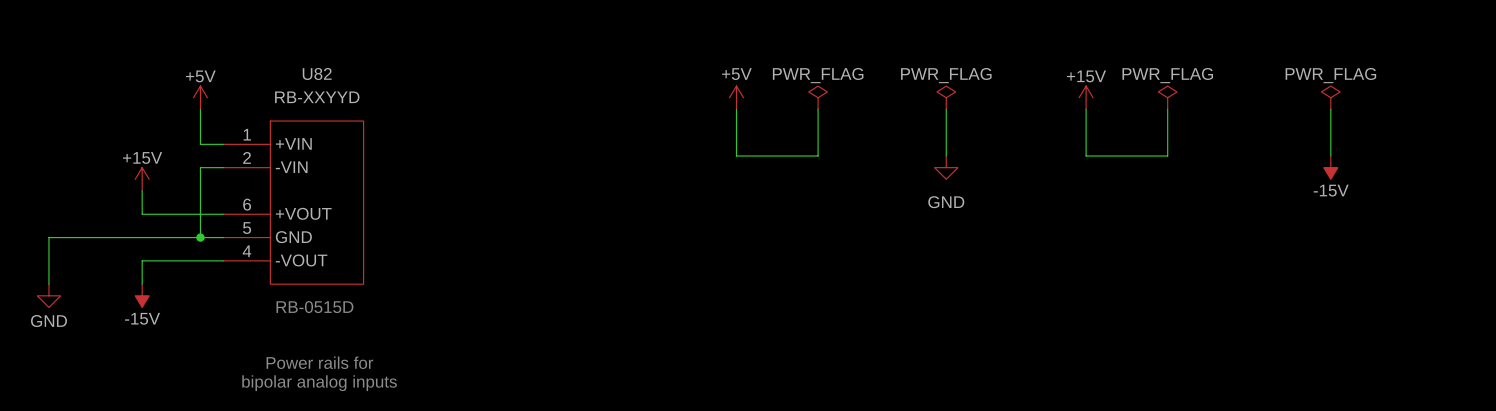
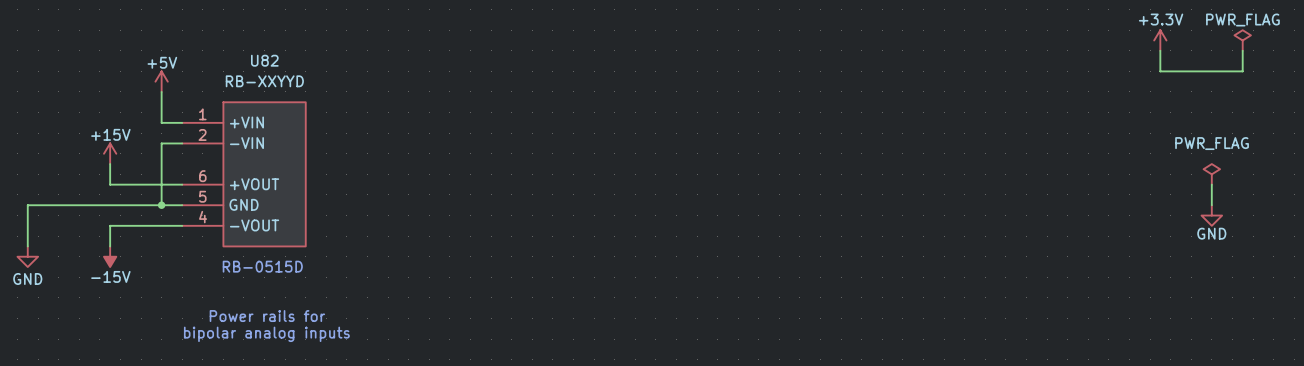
power symbol: none -> +3.3V (1160, 40)
power symbol: none -> PWR_FLAG (1242, 40)
wire: none -> (1160, 50) (1160, 71) (1242, 71) (1242, 50)
power symbol: +5V (736, 97) -> none
power symbol: PWR_FLAG (818, 97) -> none
power symbol: PWR_FLAG (946, 97) -> none
power symbol: +15V (1086, 97) -> none
power symbol: PWR_FLAG (1167, 97) -> none
power symbol: PWR_FLAG (1330, 97) -> none
wire: (736, 109) (736, 156) (818, 156) (818, 109) -> none
wire: (946, 109) (946, 156) -> none
wire: (1086, 109) (1086, 156) (1167, 156) (1167, 109) -> none
wire: (1330, 109) (1330, 156) -> none
power symbol: GND (946, 167) -> none
power symbol: -15V (1330, 167) -> none
power symbol: none -> PWR_FLAG (1211, 174)
wire: none -> (1211, 184) (1211, 205)
power symbol: none -> GND (1211, 215)

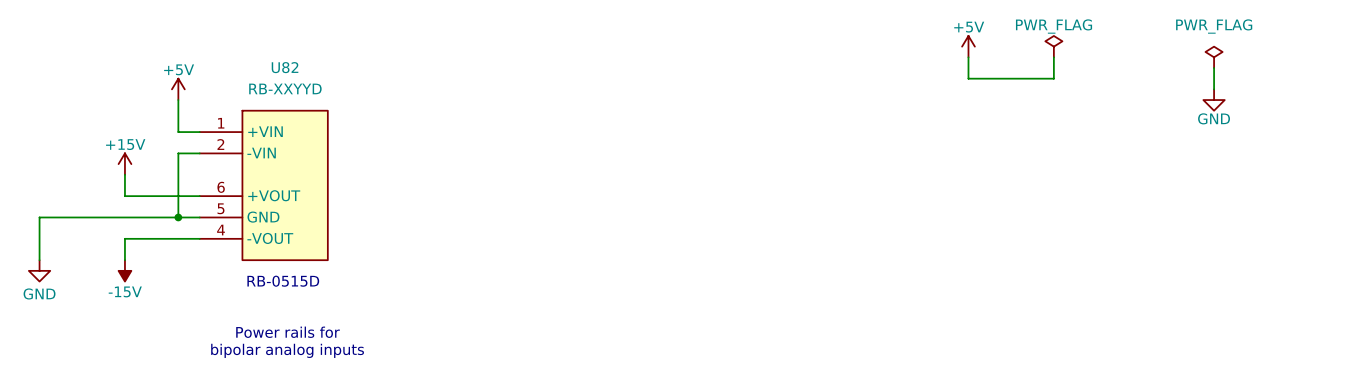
power symbol: none -> +5V (968, 46)
power symbol: none -> PWR_FLAG (1053, 46)
power symbol: +3.3V (1160, 40) -> none
power symbol: PWR_FLAG (1242, 40) -> none
wire: none -> (968, 57) (968, 78) (1053, 78) (1053, 57)
power symbol: none -> PWR_FLAG (1214, 57)
wire: (1242, 50) (1242, 71) (1160, 71) -> (1214, 89) (1214, 78)
power symbol: PWR_FLAG (1211, 174) -> none
wire: (1211, 184) (1211, 205) -> none
power symbol position: GND (1211, 215) -> GND (1214, 100)

